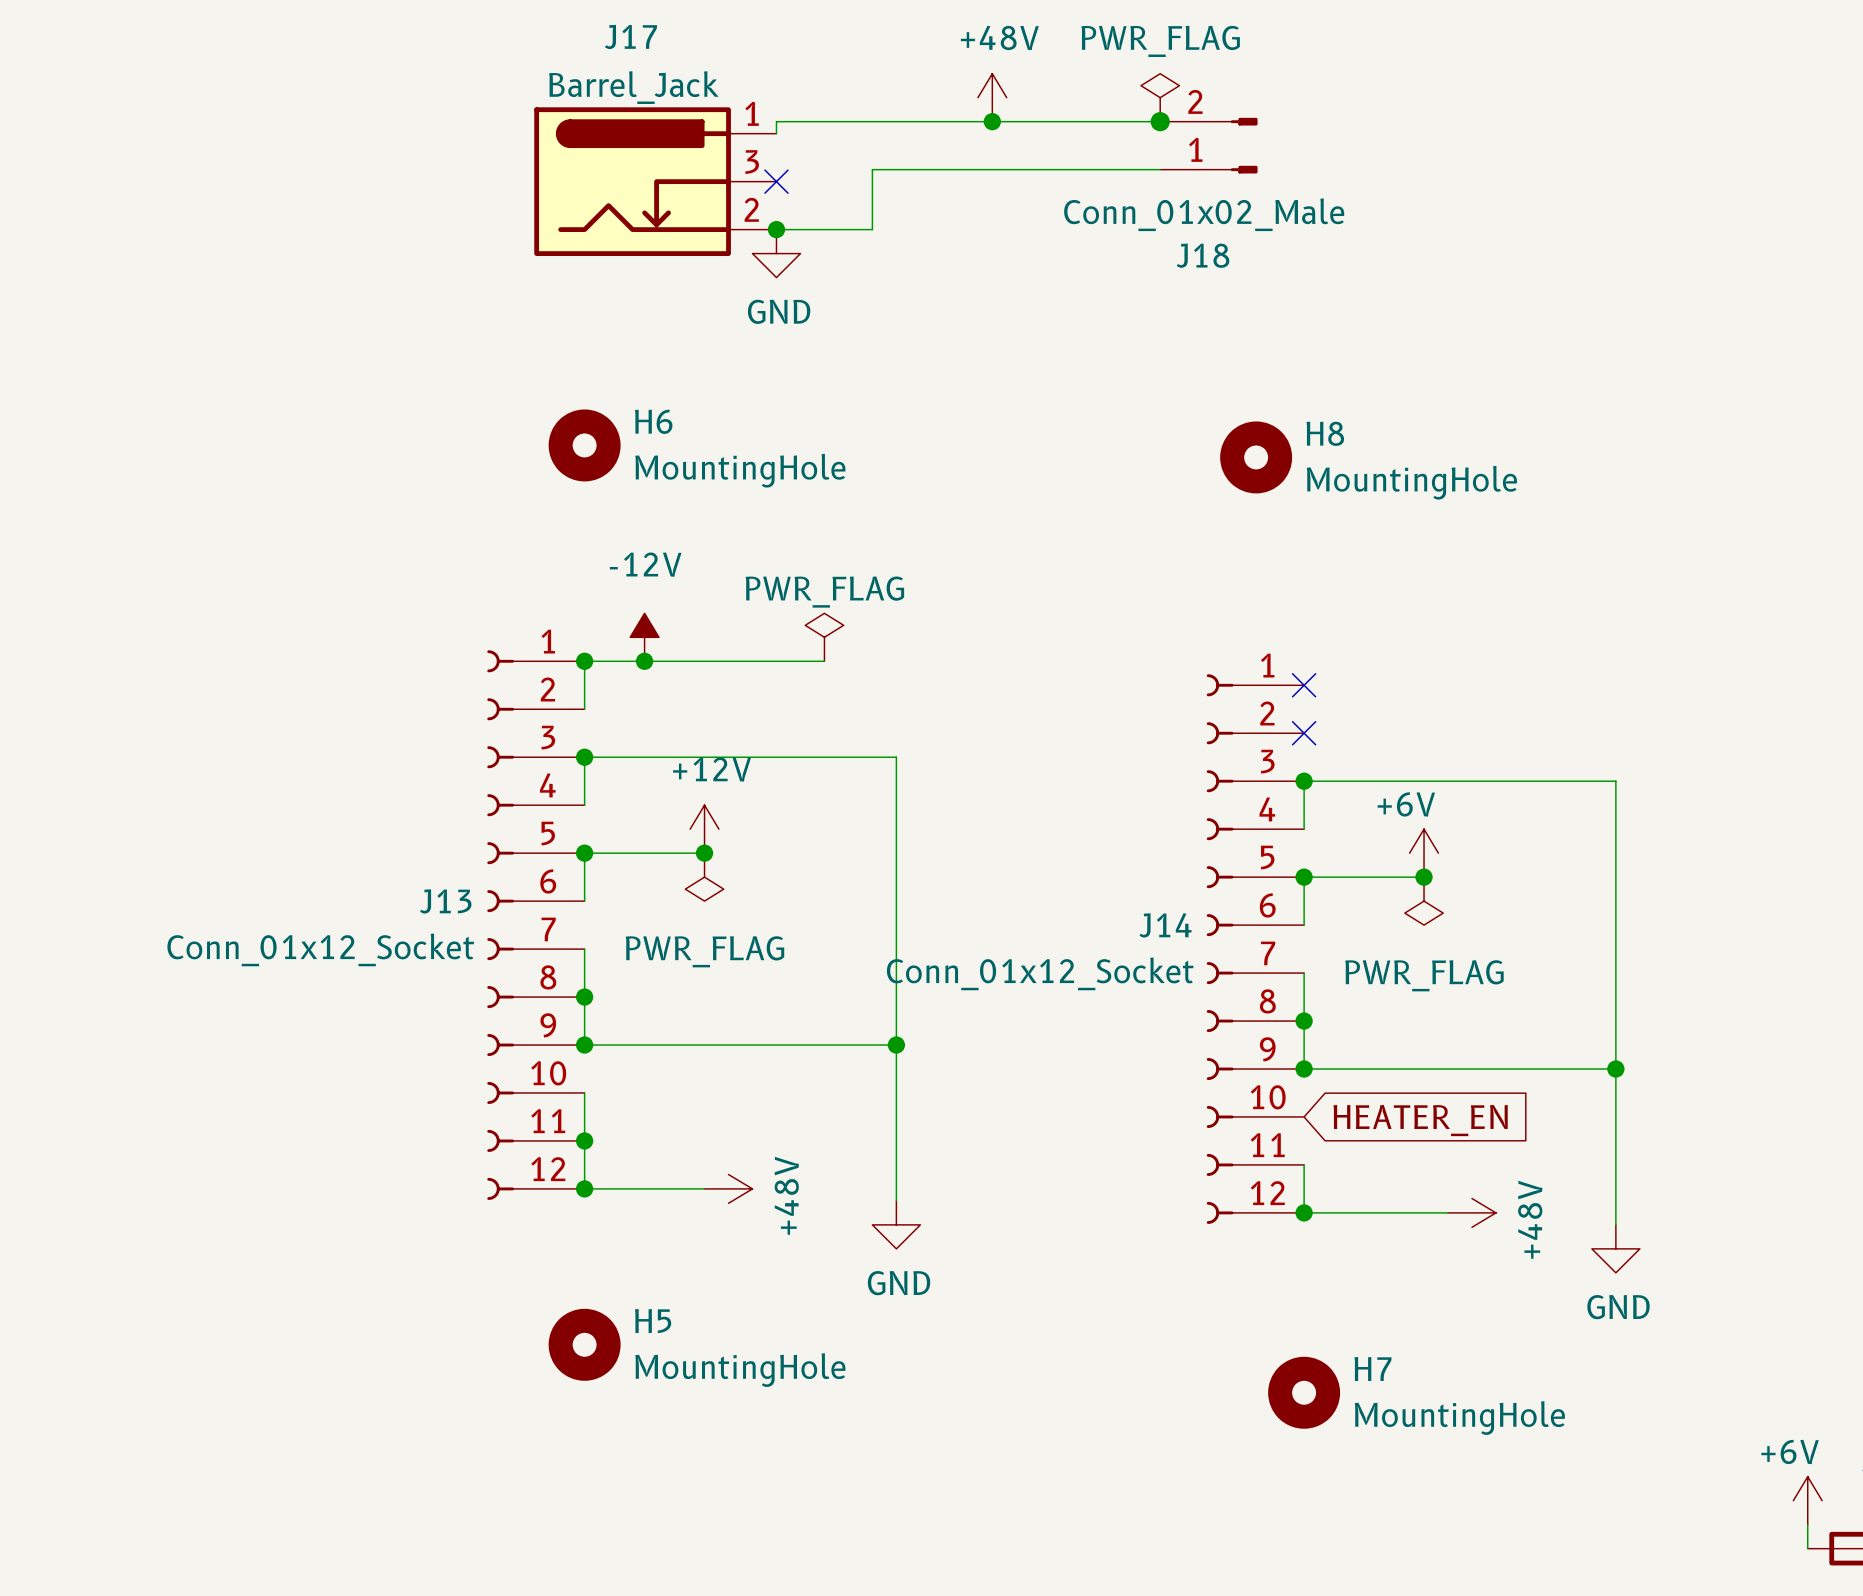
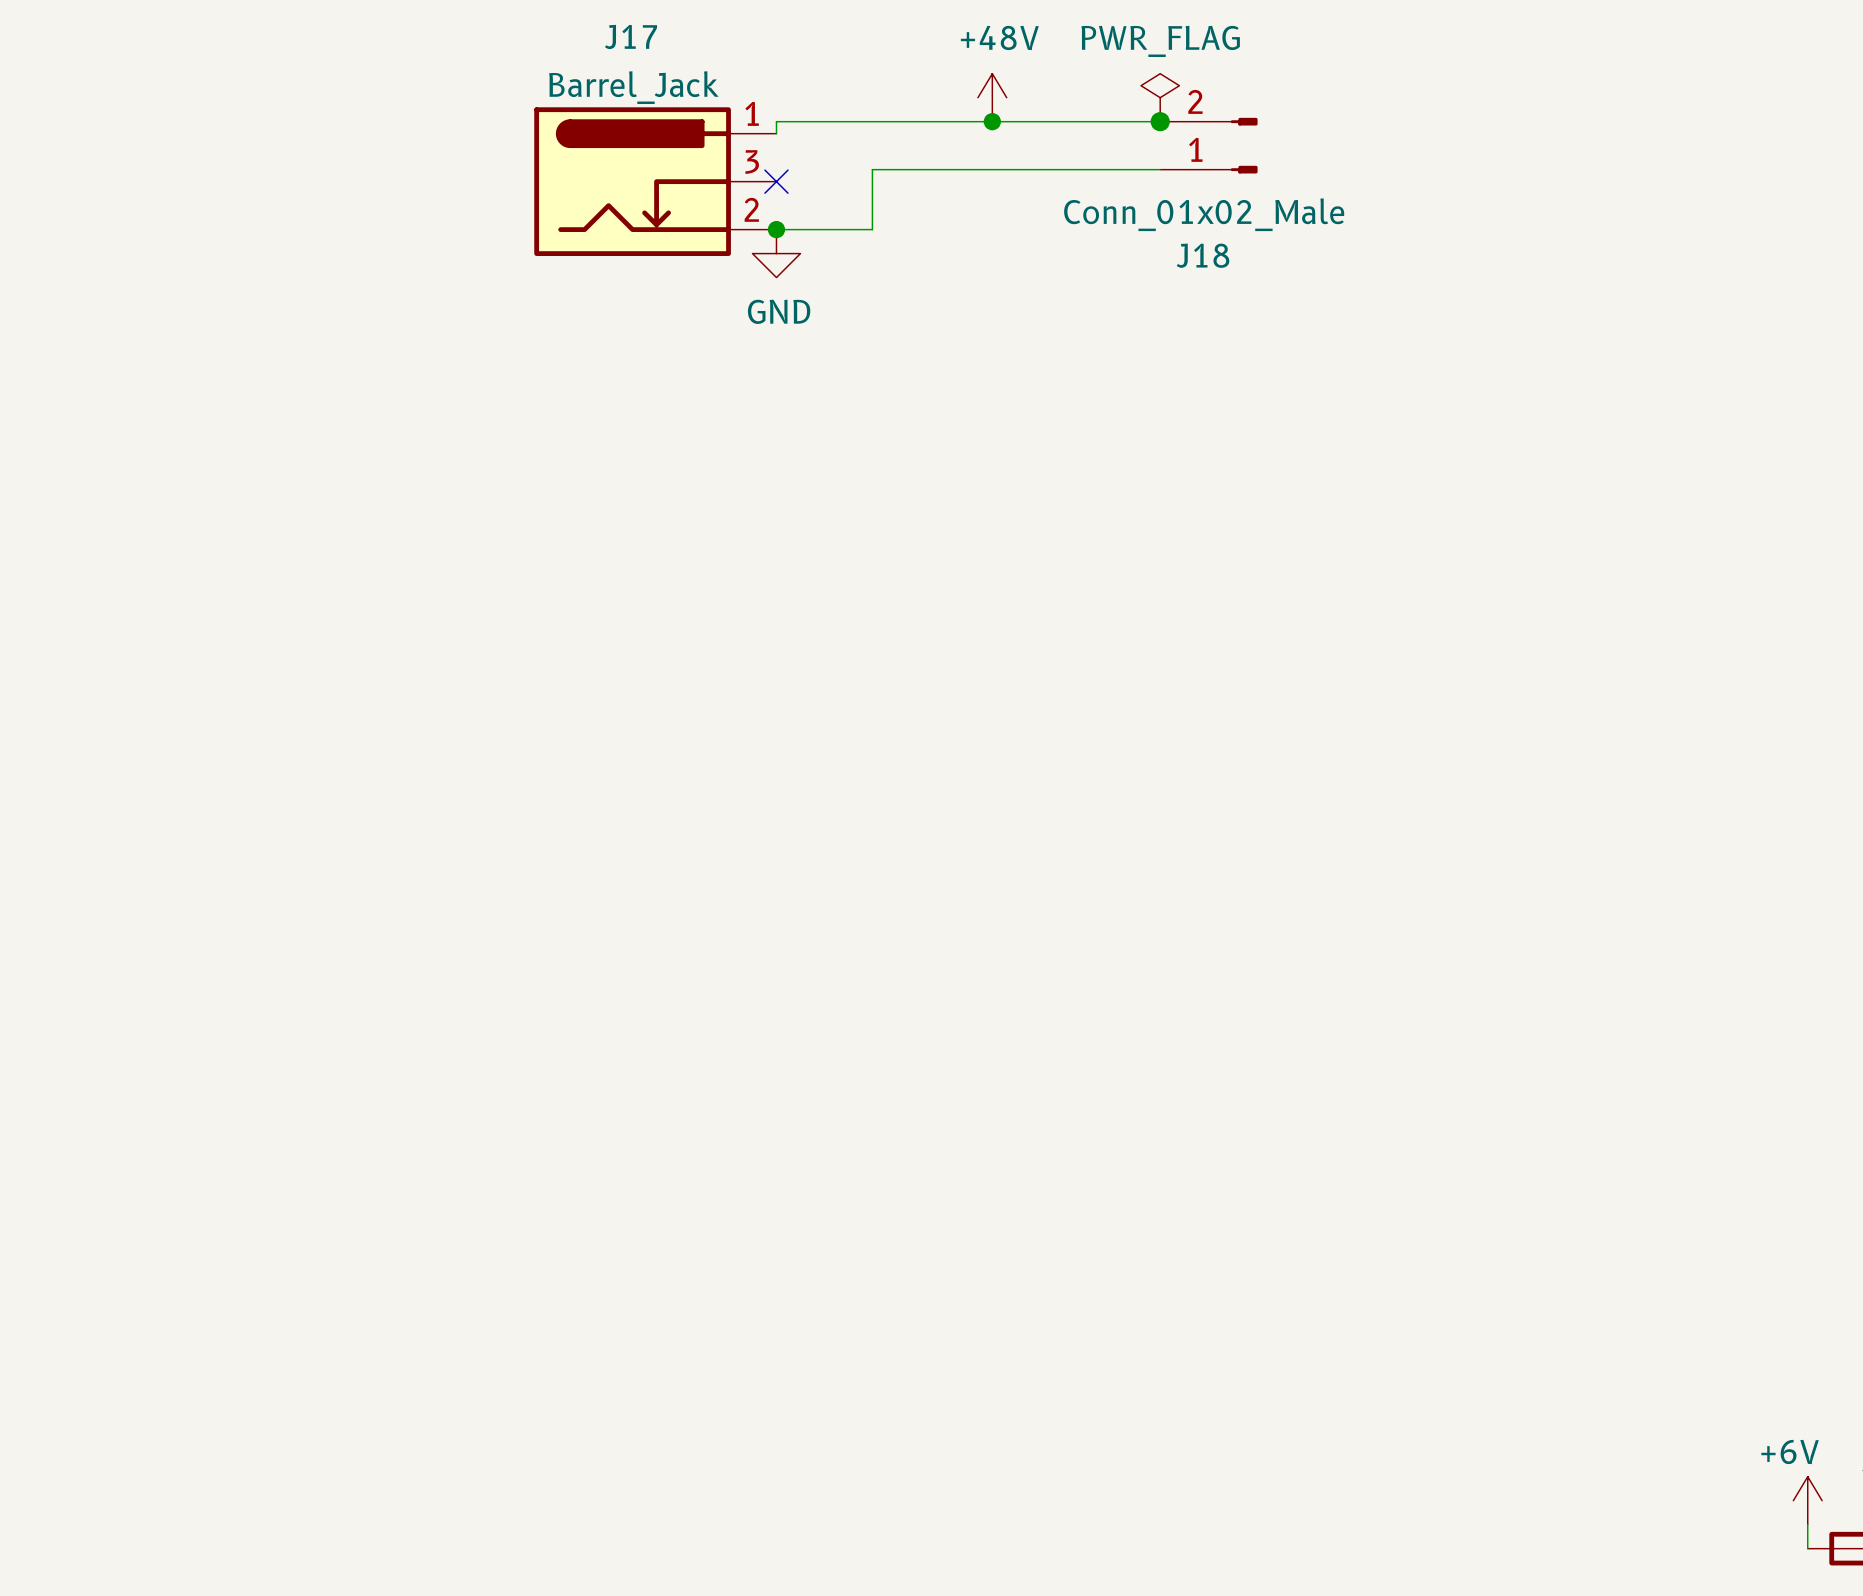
H6: MountingHole (584, 445) -> none
H8: MountingHole (1256, 457) -> none
power symbol: -12V (644, 637) -> none
power symbol: PWR_FLAG (824, 637) -> none
junction: (584, 661) -> none
junction: (644, 661) -> none
wire: (824, 661) (584, 661) (584, 709) -> none
no-connect mark: (1304, 685) -> none
no-connect mark: (1304, 733) -> none
junction: (584, 757) -> none
junction: (1304, 781) -> none
wire: (584, 805) (584, 757) (896, 757) (896, 1200) -> none
power symbol: +12V (704, 829) -> none
wire: (1304, 829) (1304, 781) (1615, 781) (1615, 1224) -> none
junction: (584, 853) -> none
wire: (704, 853) (584, 853) (584, 901) -> none
junction: (704, 853) -> none
power symbol: +6V (1424, 853) -> none
power symbol: PWR_FLAG (704, 877) -> none
junction: (1304, 877) -> none
wire: (1424, 877) (1304, 877) (1304, 925) -> none
junction: (1424, 877) -> none
power symbol: PWR_FLAG (1424, 901) -> none
J13: Conn_01x12_Socket (535, 925) -> none
wire: (584, 949) (584, 1045) (896, 1045) -> none
J14: Conn_01x12_Socket (1255, 949) -> none
wire: (1304, 973) (1304, 1069) (1615, 1069) -> none
junction: (584, 997) -> none
junction: (1304, 1021) -> none
junction: (584, 1045) -> none
junction: (896, 1045) -> none
junction: (1304, 1069) -> none
junction: (1615, 1069) -> none
wire: (584, 1092) (584, 1188) (704, 1188) -> none
global label: HEATER_EN (1420, 1120) -> none
junction: (584, 1140) -> none
wire: (1304, 1164) (1304, 1212) (1448, 1212) -> none
junction: (584, 1188) -> none
power symbol: +48V (728, 1188) -> none
junction: (1304, 1212) -> none
power symbol: +48V (1471, 1212) -> none
power symbol: GND (896, 1224) -> none
power symbol: GND (1615, 1248) -> none
H5: MountingHole (584, 1344) -> none
H7: MountingHole (1304, 1392) -> none

